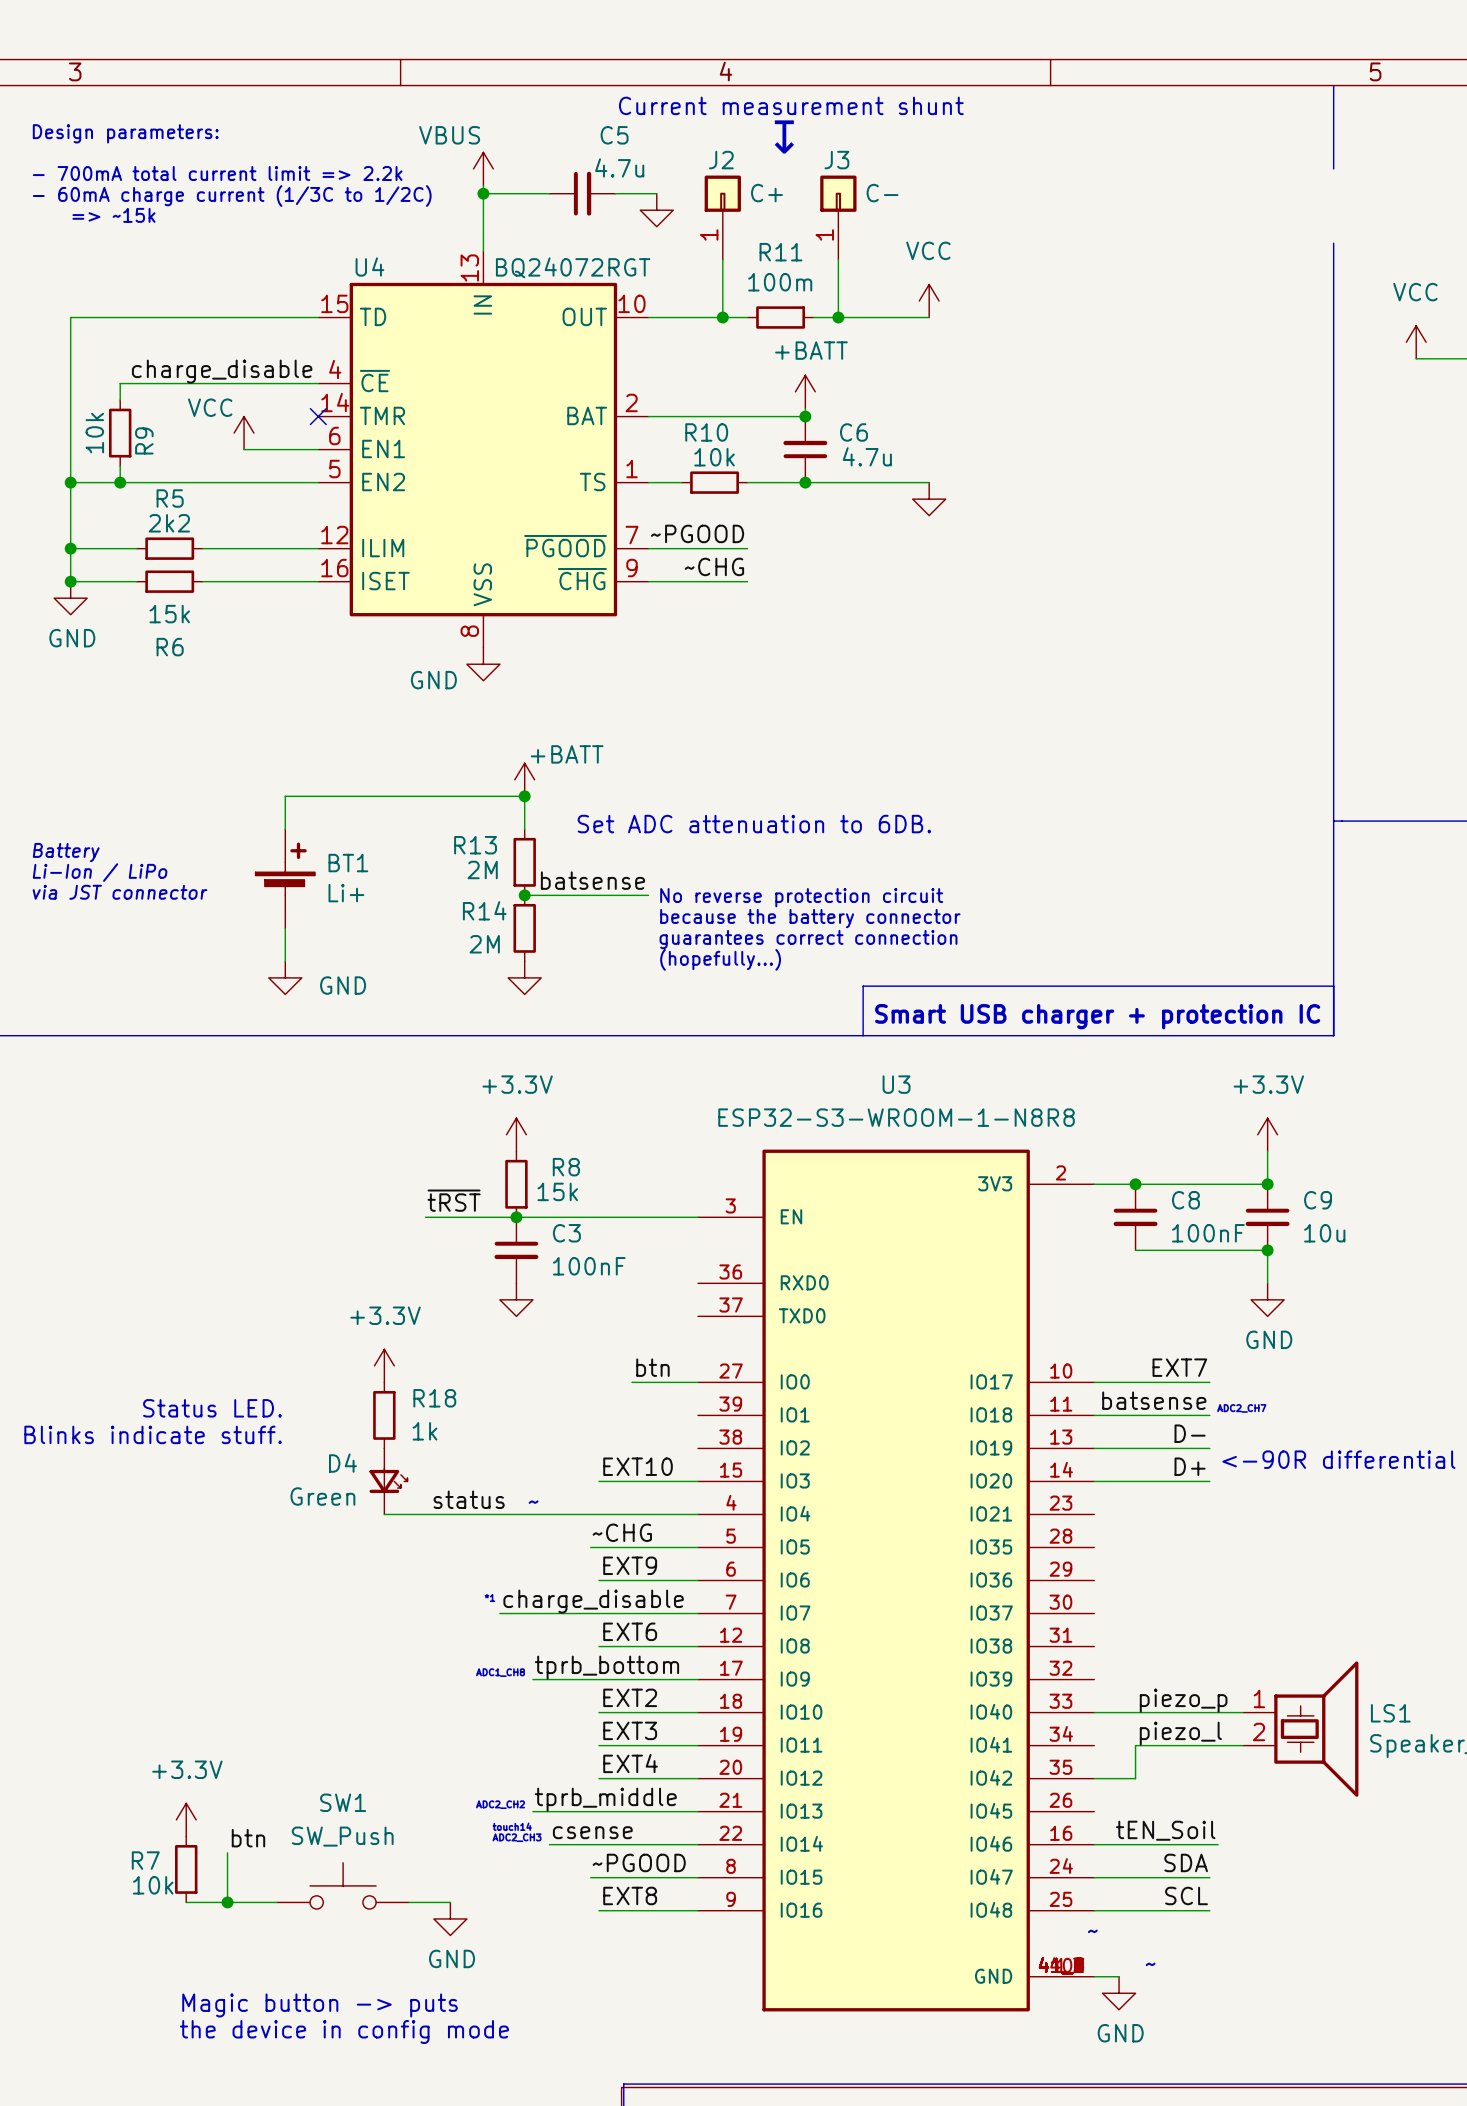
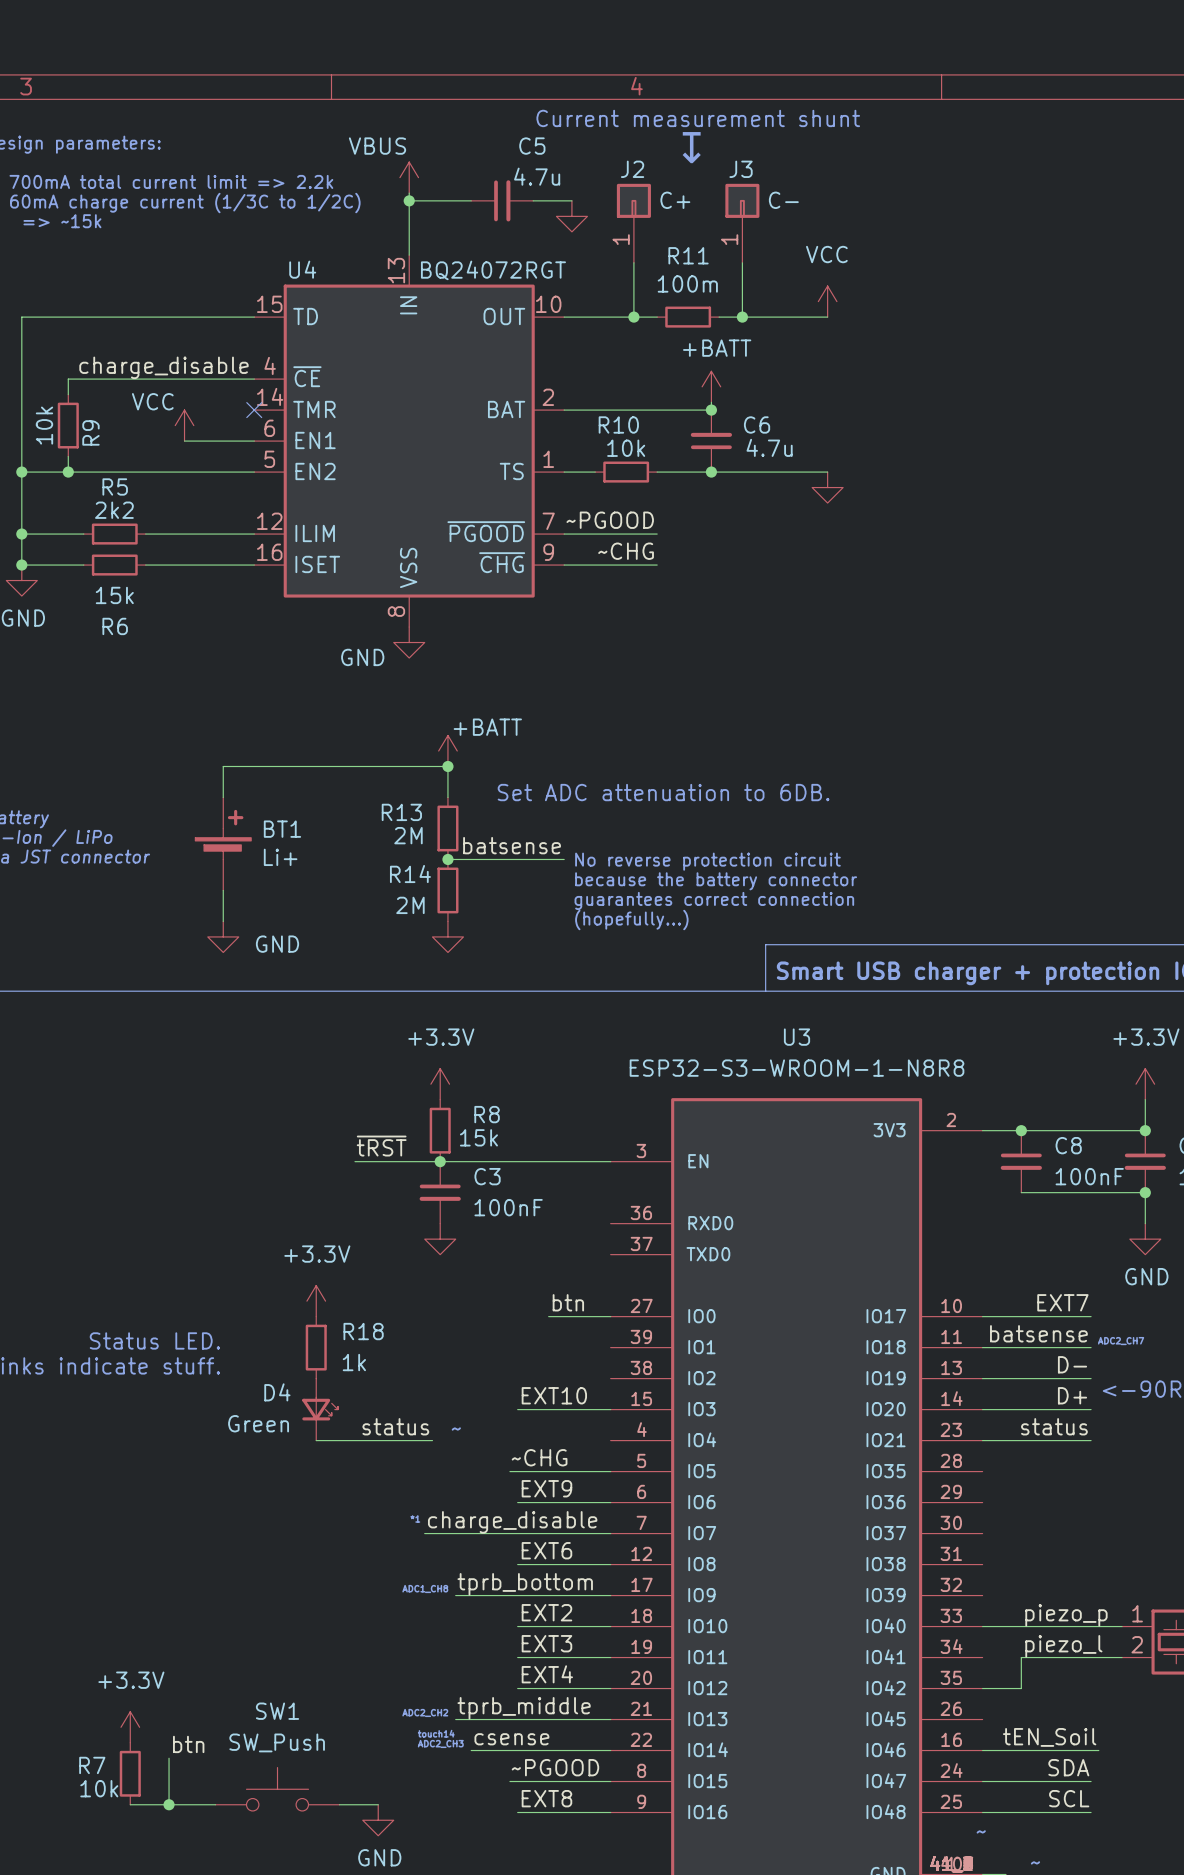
label: none -> status (1054, 1426)
wire: (508, 1514) (698, 1514) -> none
wire: none -> (982, 1440) (1091, 1440)

